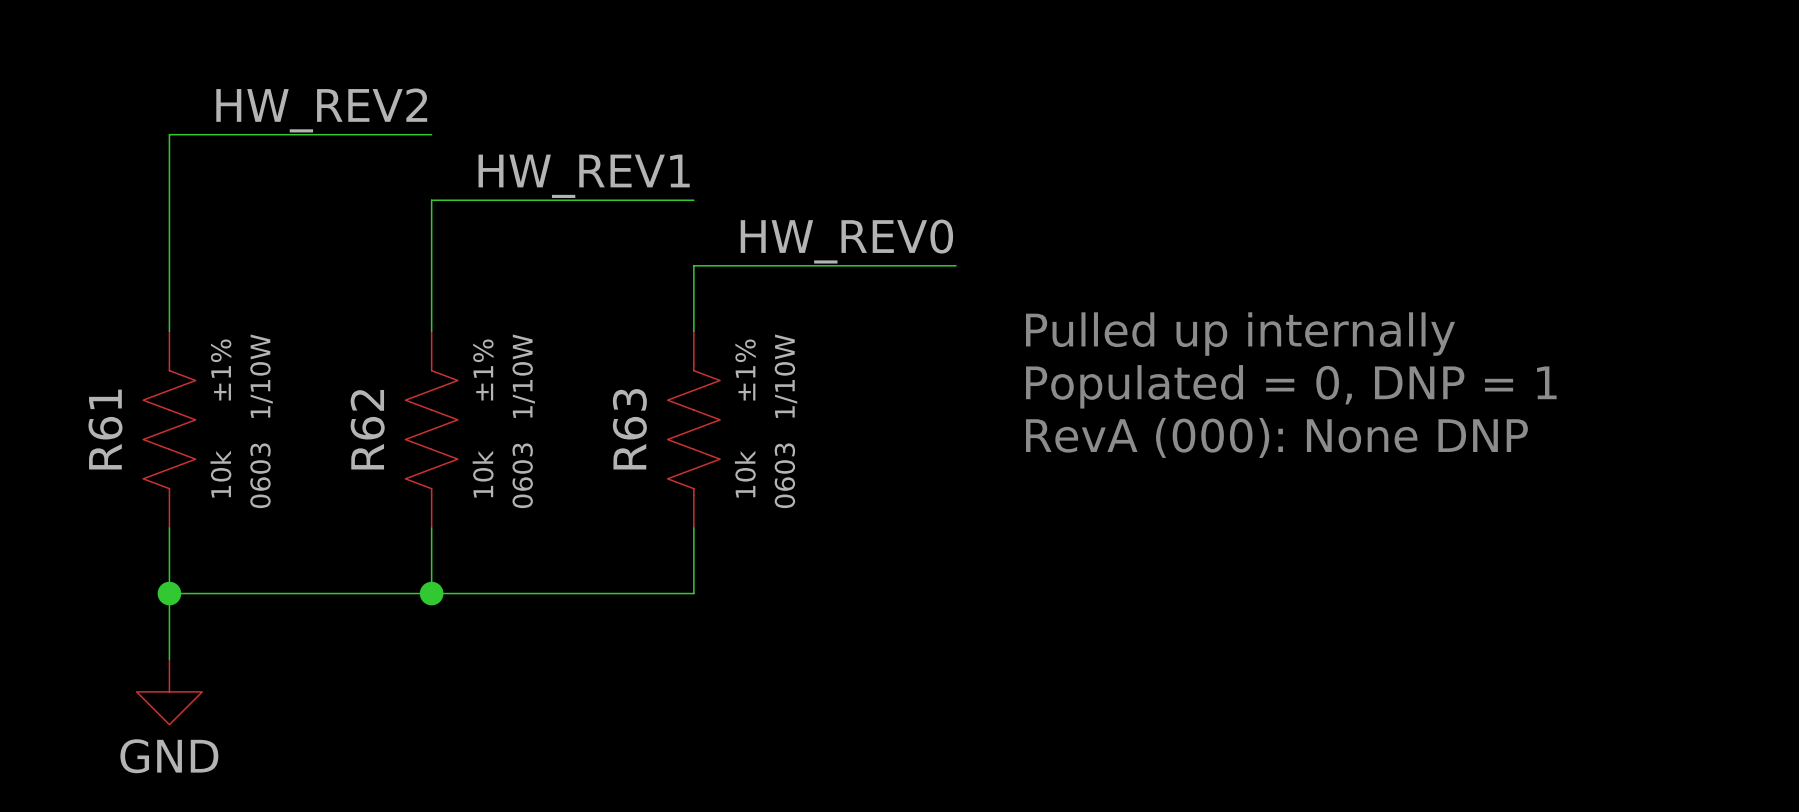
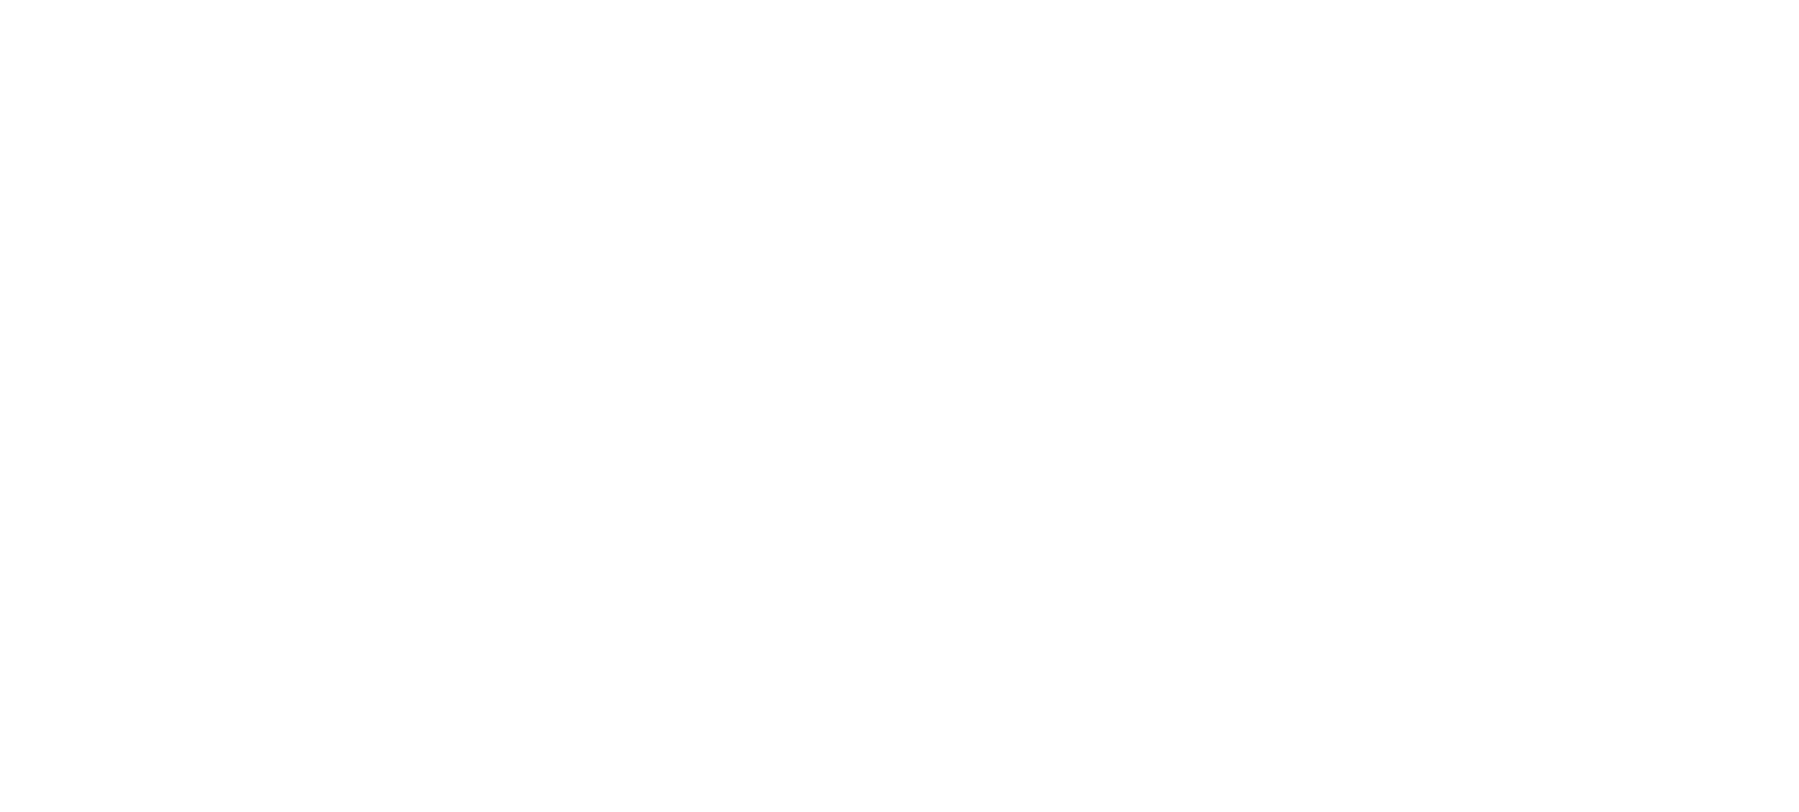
label: HW_REV2 (321, 110) -> none
wire: (431, 134) (169, 134) (169, 331) -> none
label: HW_REV1 (584, 176) -> none
wire: (693, 200) (431, 200) (431, 331) -> none
label: HW_REV0 (846, 241) -> none
wire: (956, 265) (693, 265) (693, 331) -> none
text: Pulled up internally (1240, 334) -> none
text: Populated = 0, DNP = 1 (1291, 386) -> none
R61: (169, 429) -> none
R62: (431, 429) -> none
R63: (693, 429) -> none
text: RevA (000): None DNP (1276, 437) -> none
wire: (169, 528) (169, 659) -> none
wire: (431, 528) (431, 593) -> none
wire: (693, 528) (693, 593) (169, 593) -> none
junction: (169, 593) -> none
junction: (431, 593) -> none
power symbol: GND (169, 691) -> none

